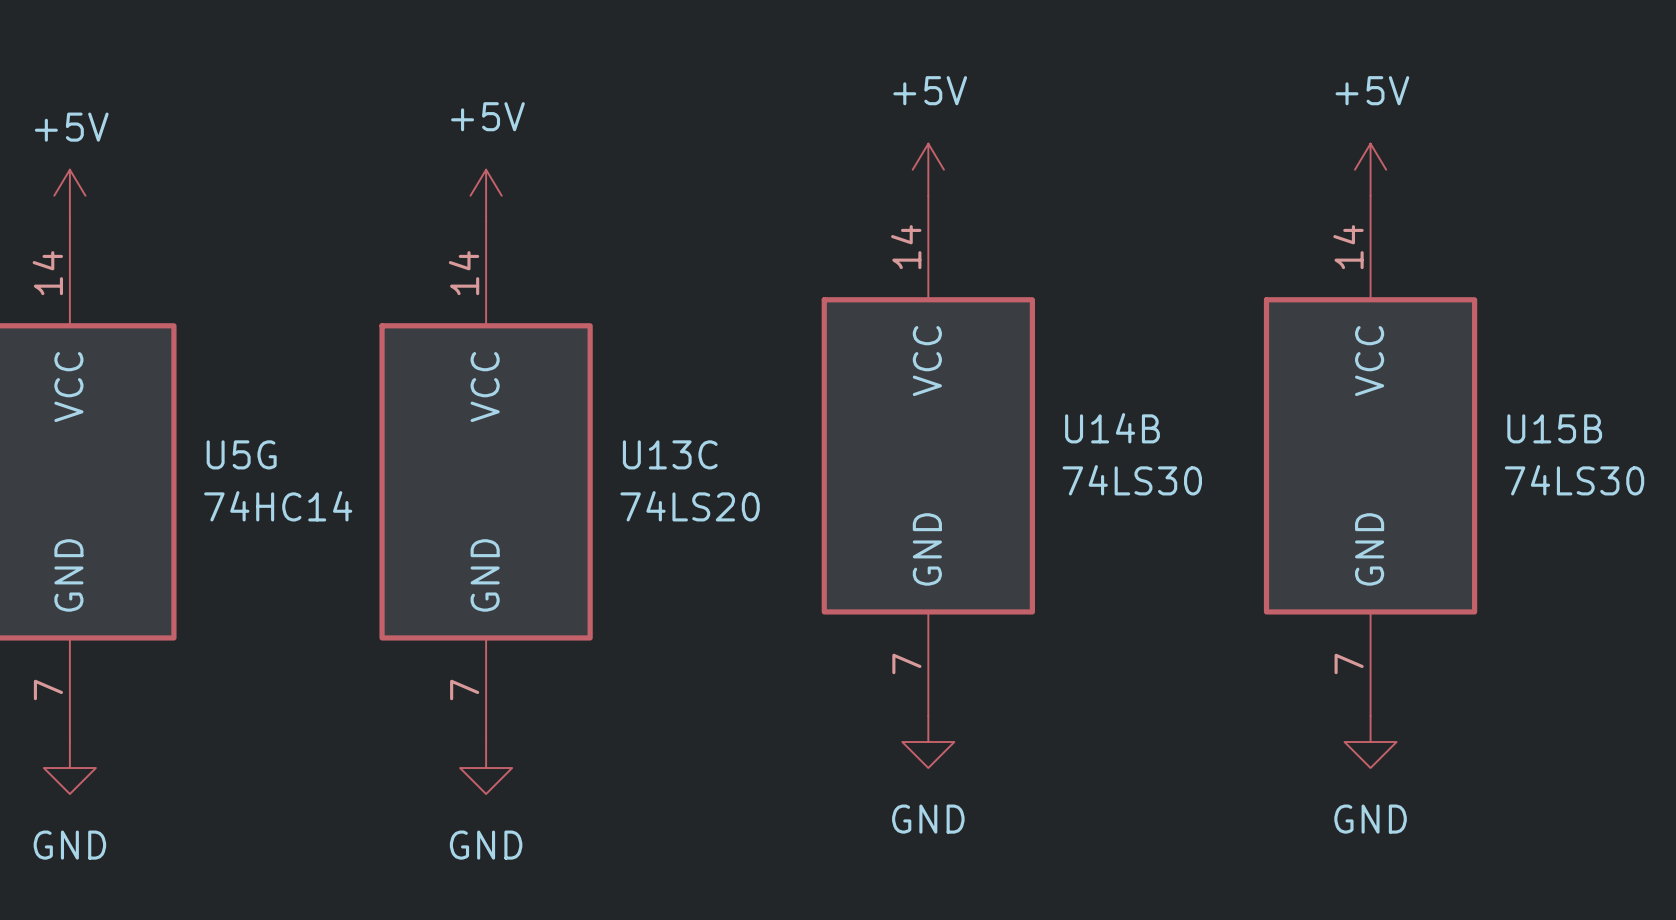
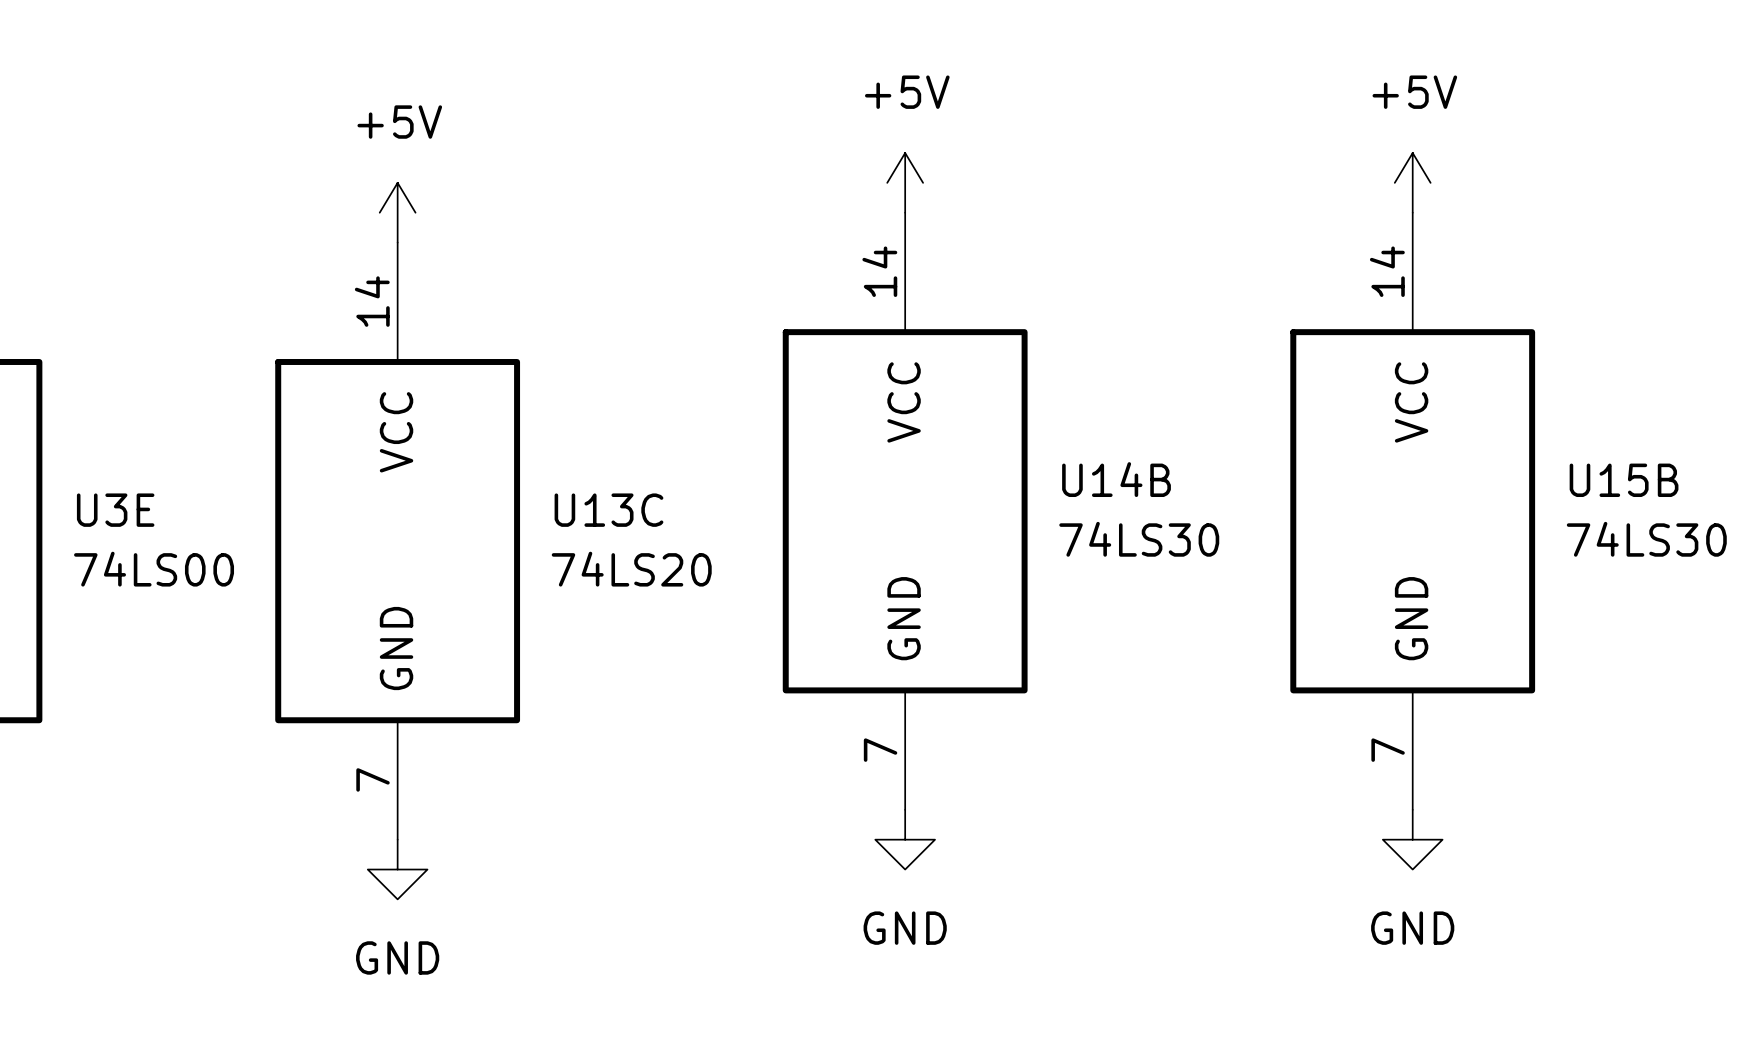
U5G name: U5G (241, 454) -> U3E (115, 510)
U5G value: 74HC14 (278, 506) -> 74LS00 (154, 569)

